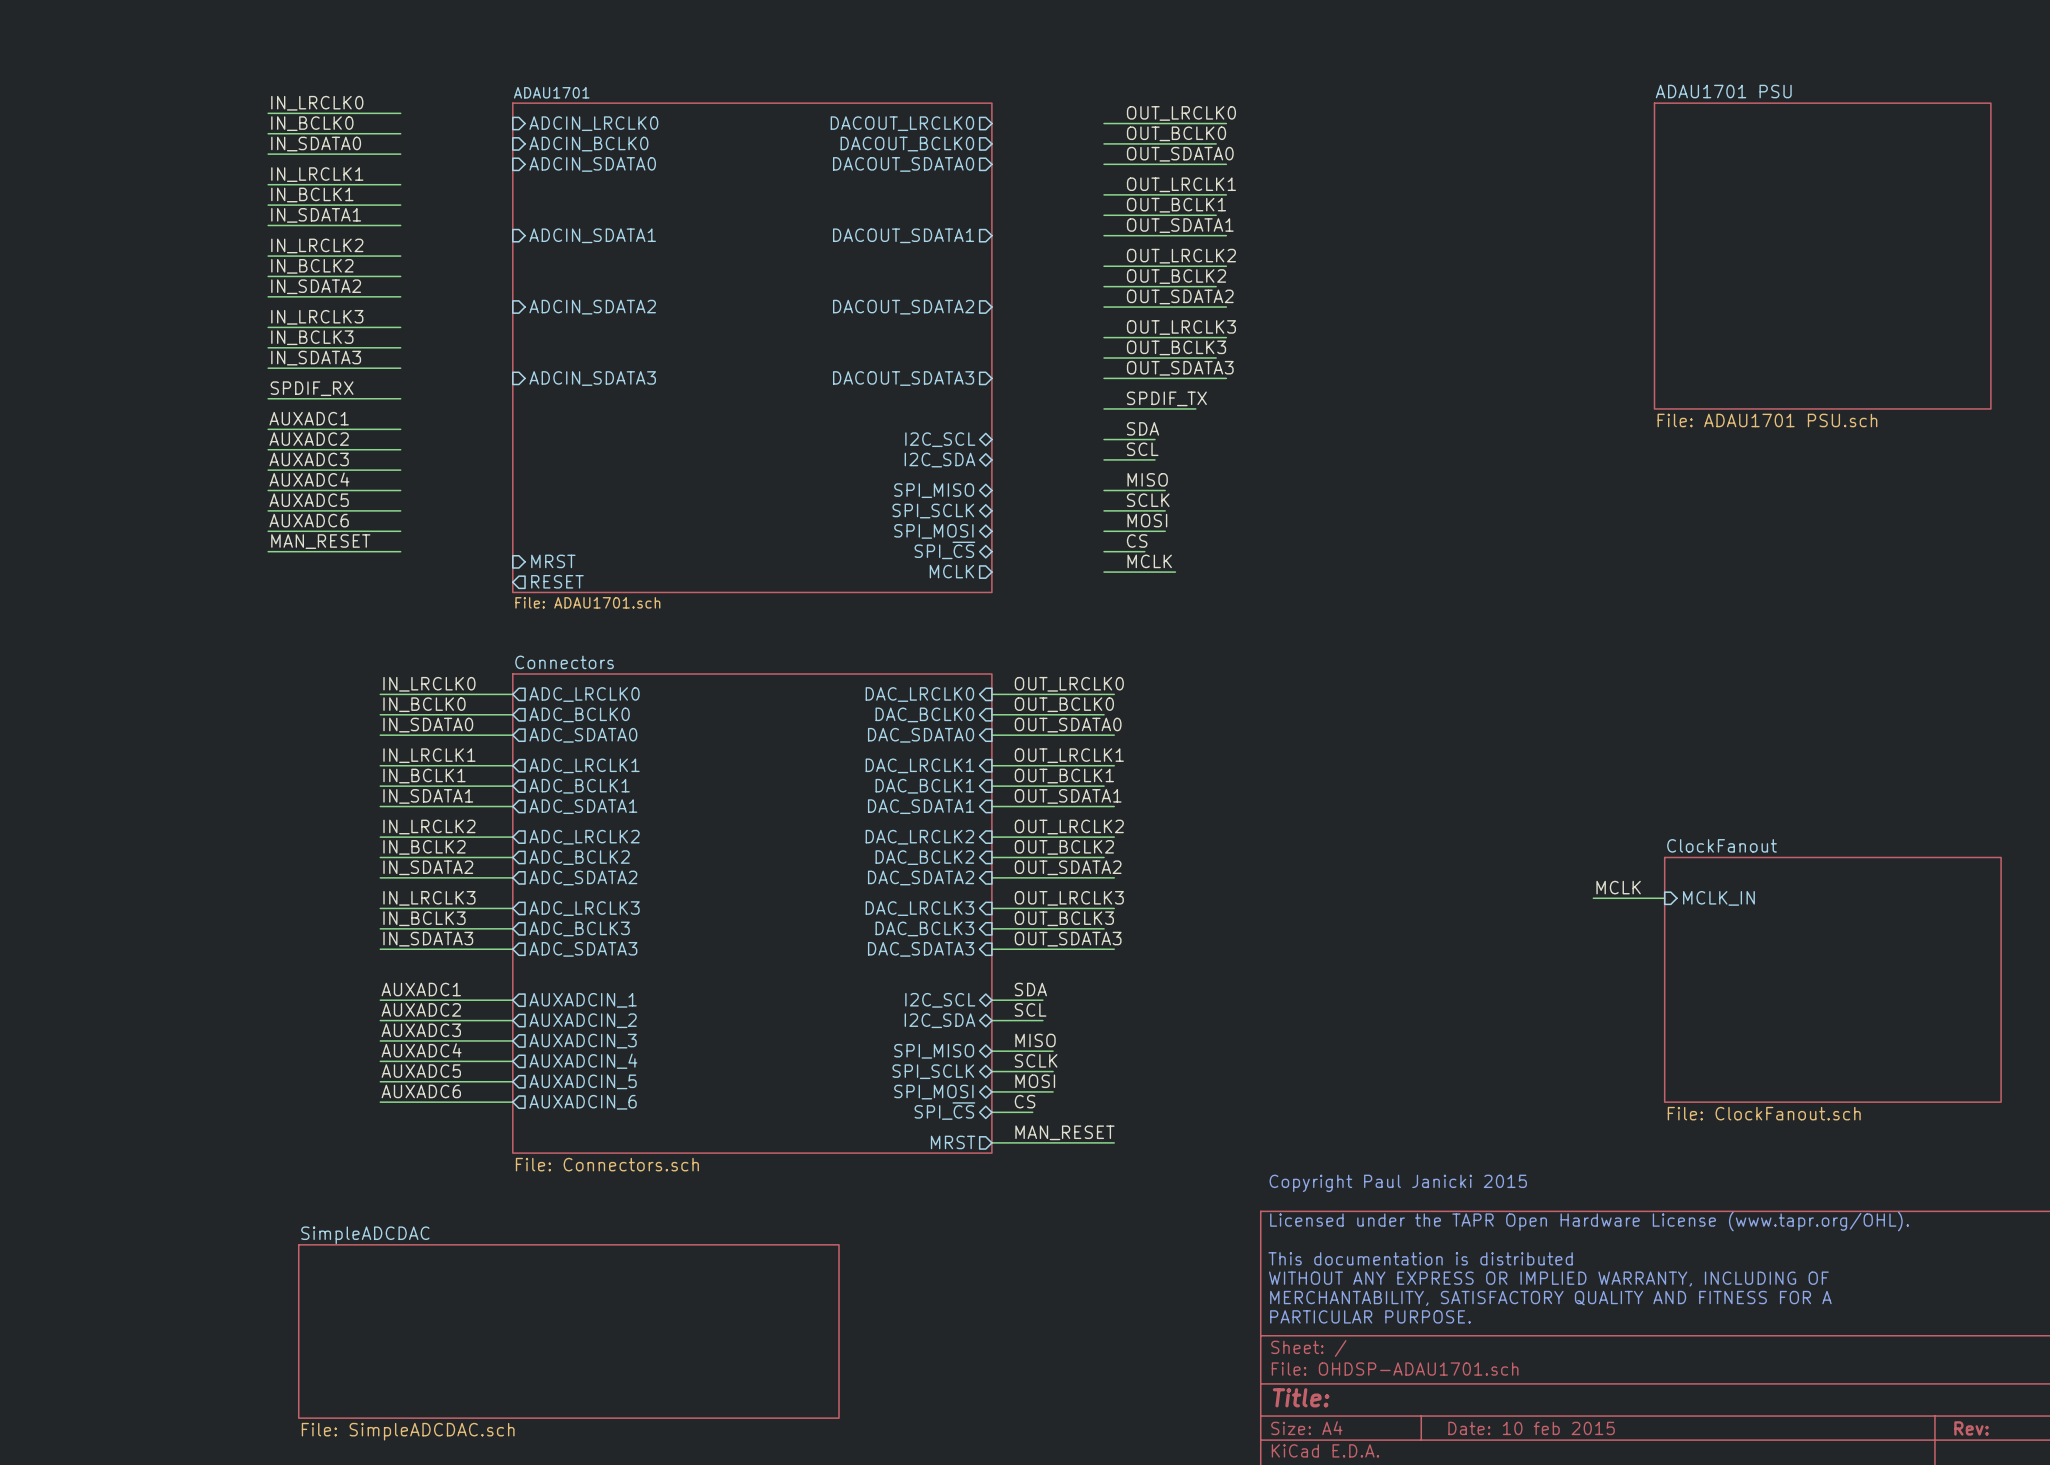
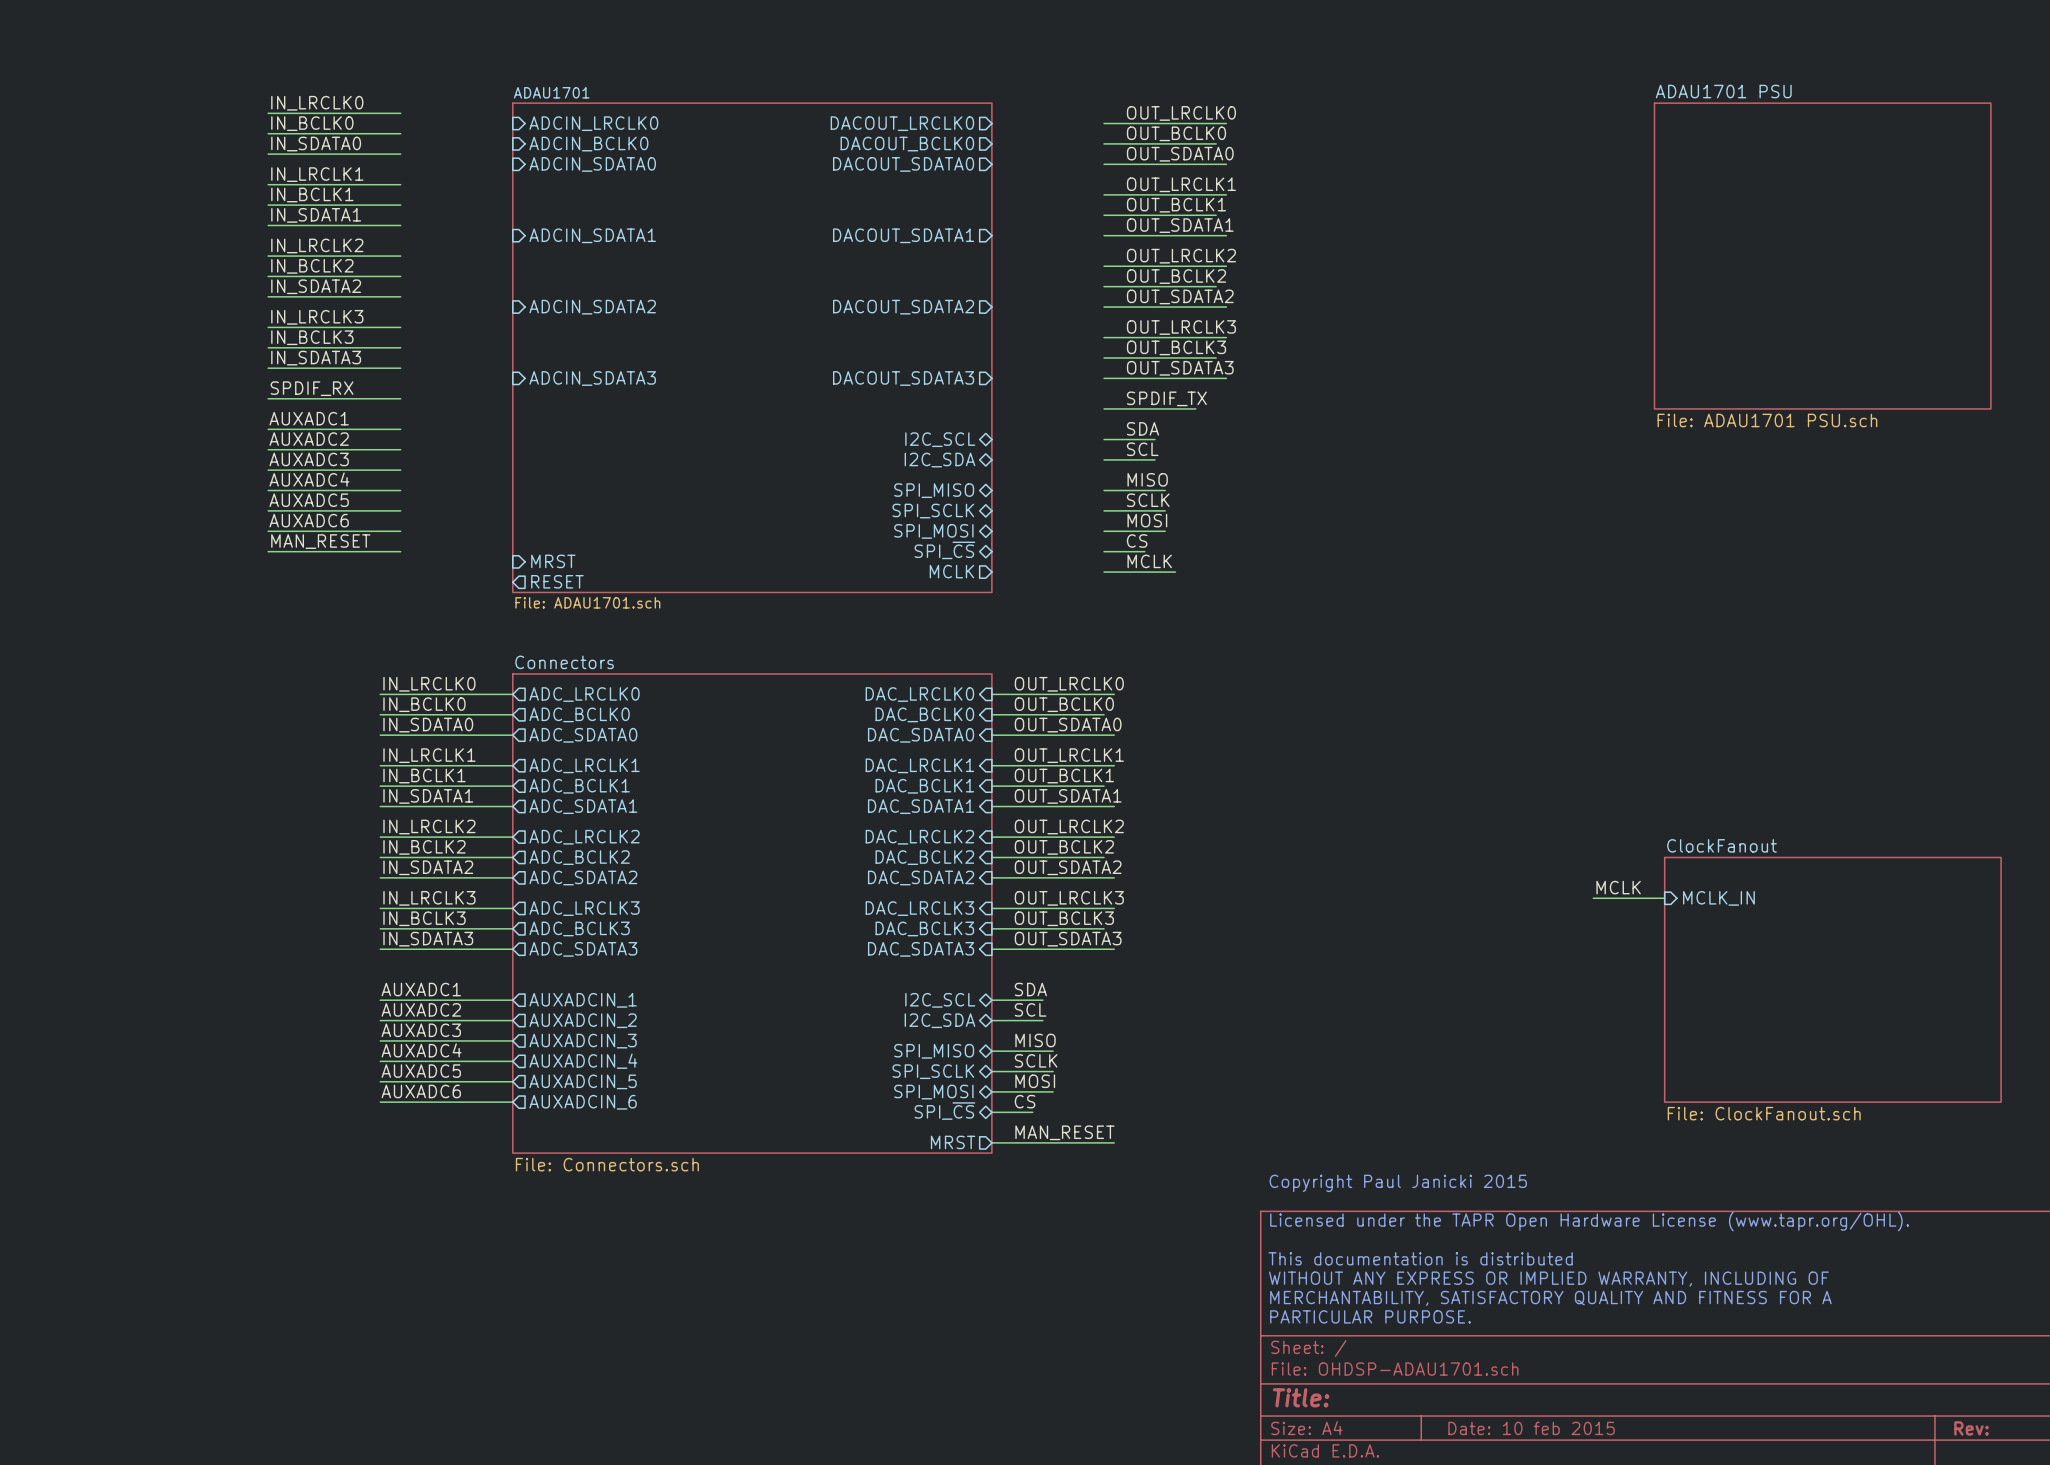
sheet SimpleADCDAC: File: SimpleADCDAC.sch (568, 1331) -> none

